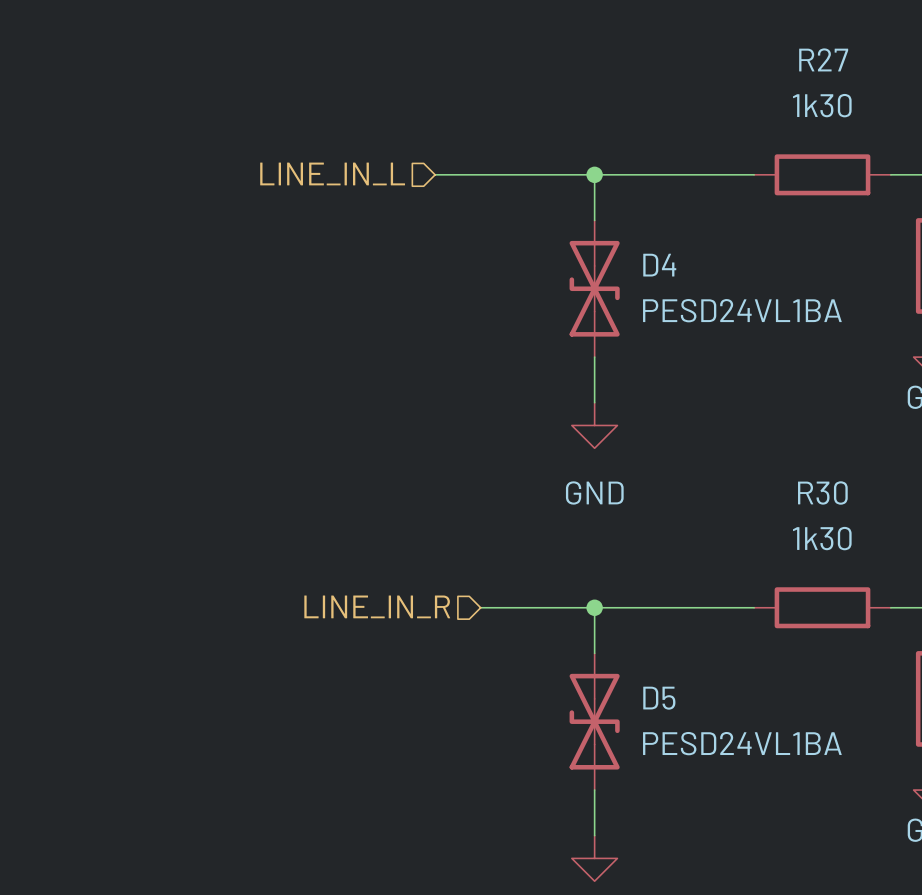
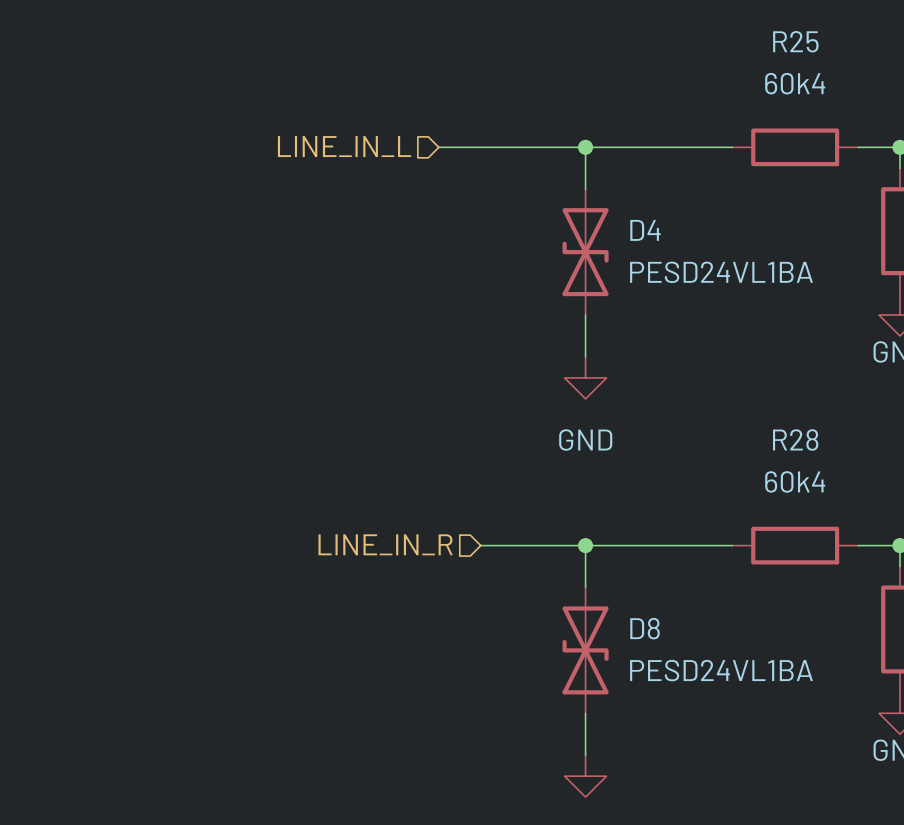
R27 name: R27 (823, 59) -> R25 (795, 41)
R27 value: 1k30 (822, 105) -> 60k4 (795, 83)
R30 name: R30 (822, 492) -> R28 (795, 439)
R30 value: 1k30 (822, 538) -> 60k4 (795, 481)
D5 name: D5 (659, 698) -> D8 (645, 628)

